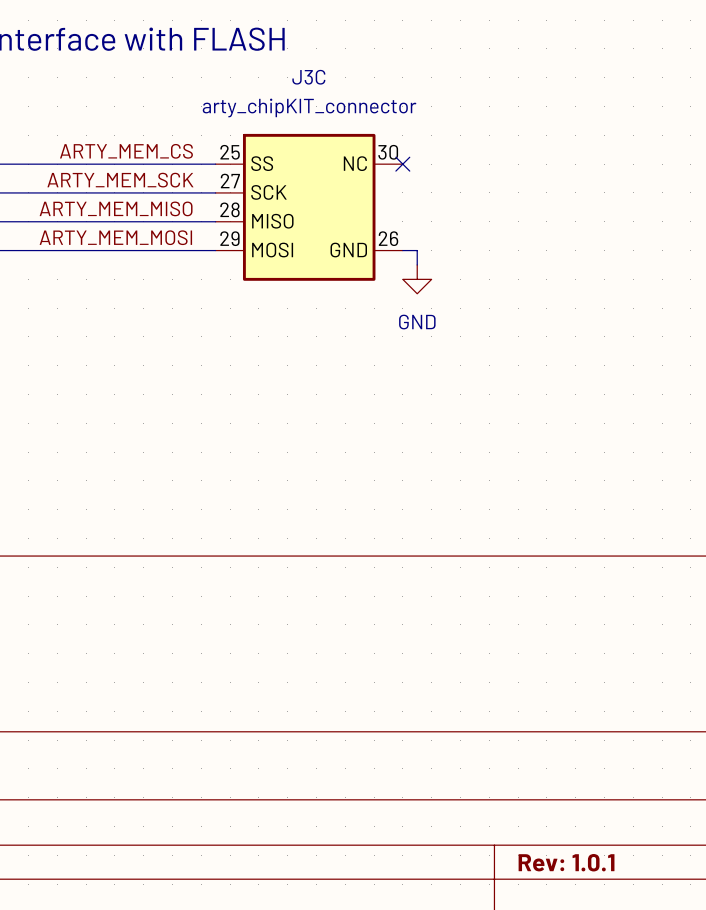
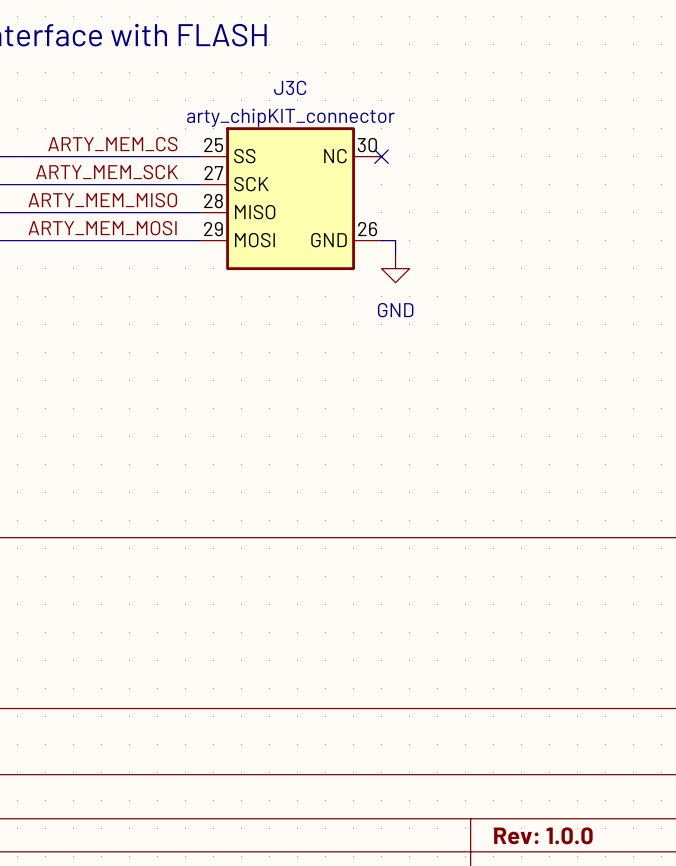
J3C name position: J3C (308, 77) -> J3C (290, 87)
J3C value position: arty_chipKIT_connector (309, 107) -> arty_chipKIT_connector (290, 117)
title block: Rev: 1.0.1 (566, 862) -> Rev: 1.0.0 (543, 835)

